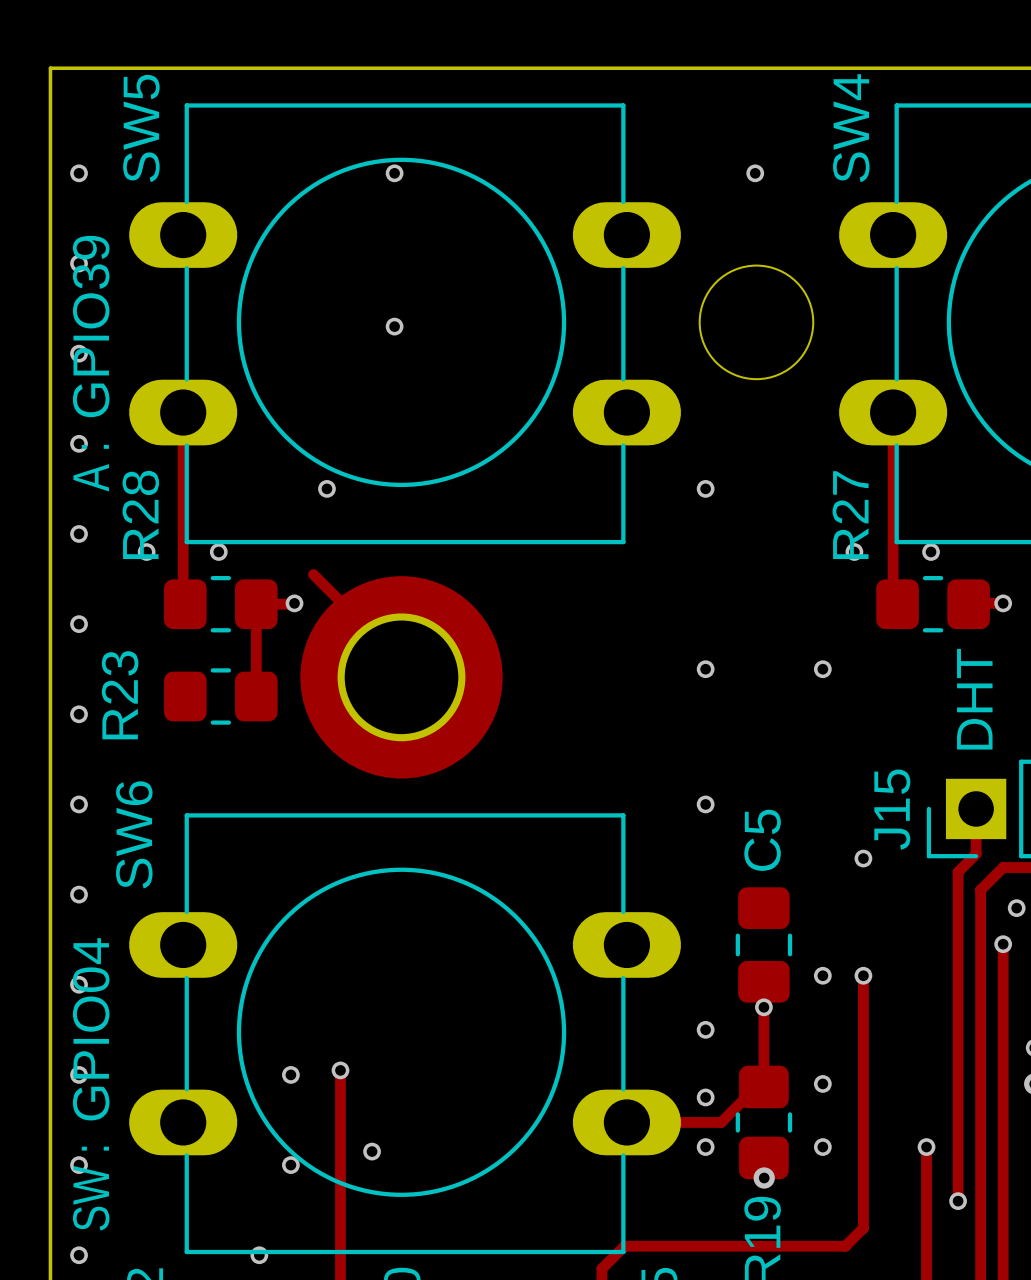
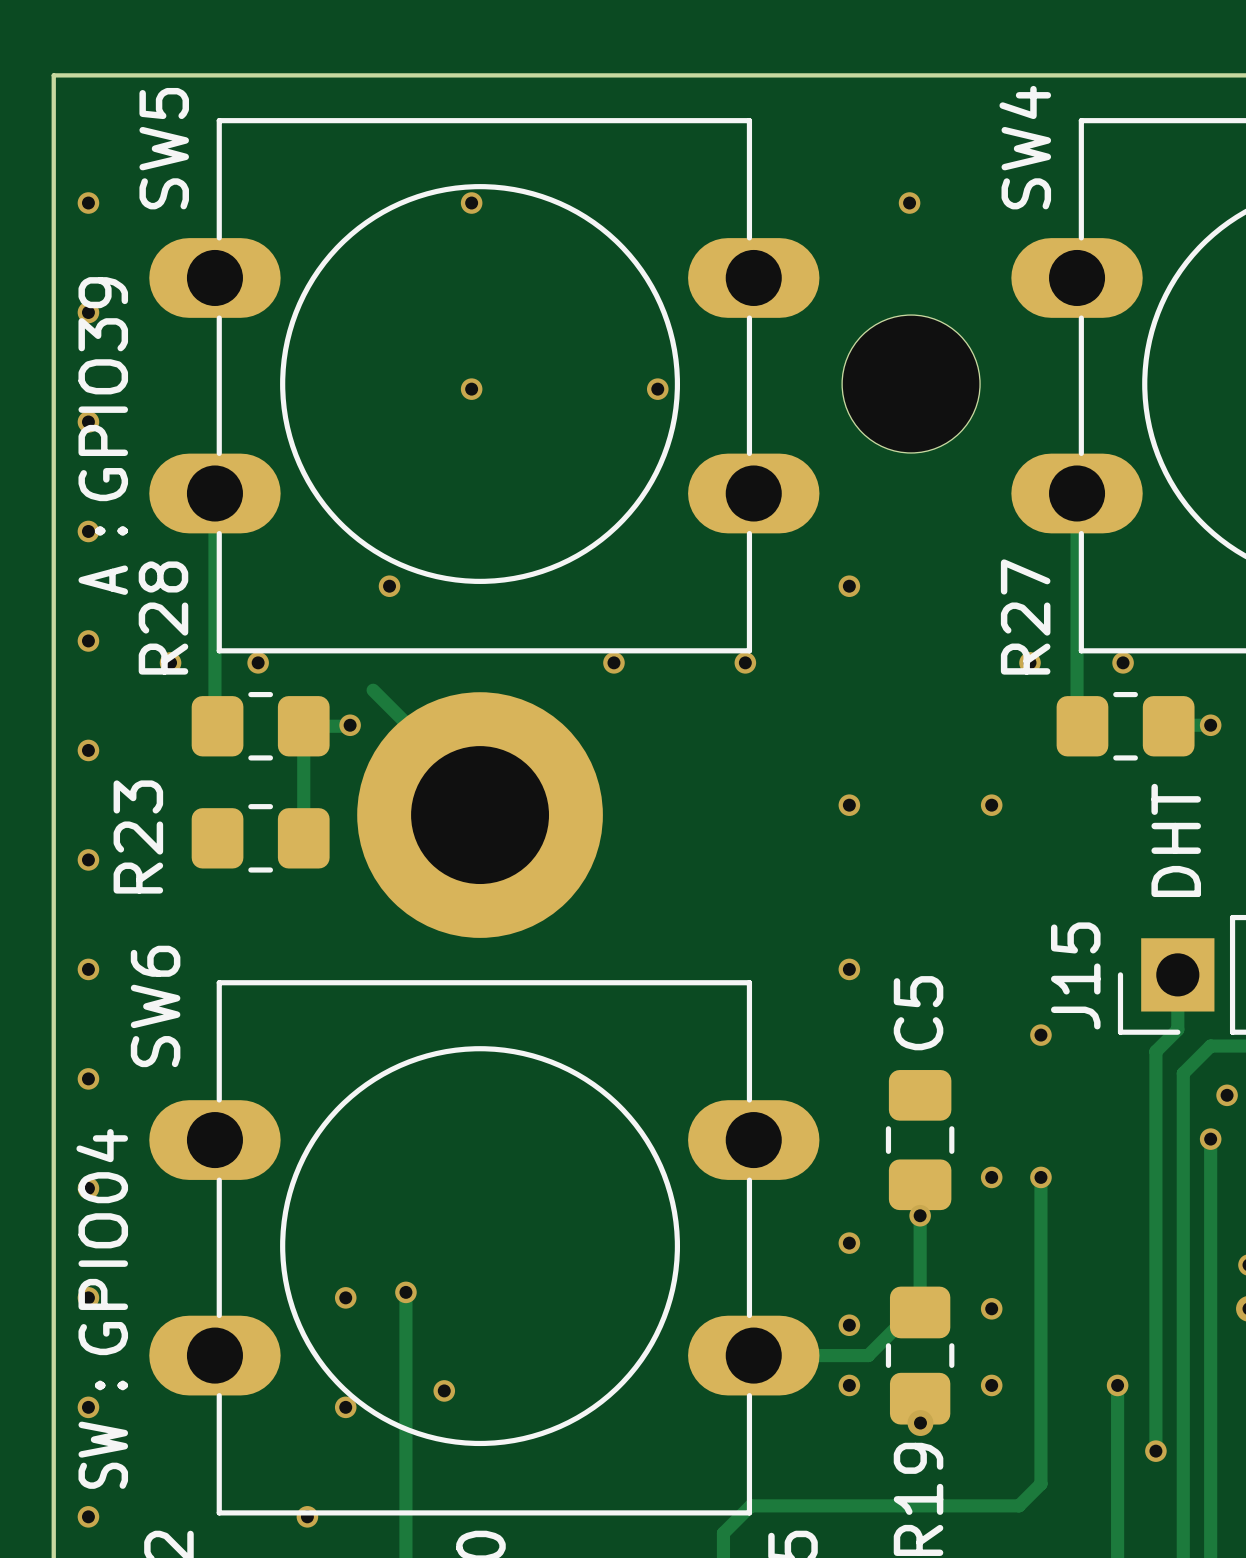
via: none -> (657, 389)
via: none -> (613, 662)
via: none -> (745, 662)

